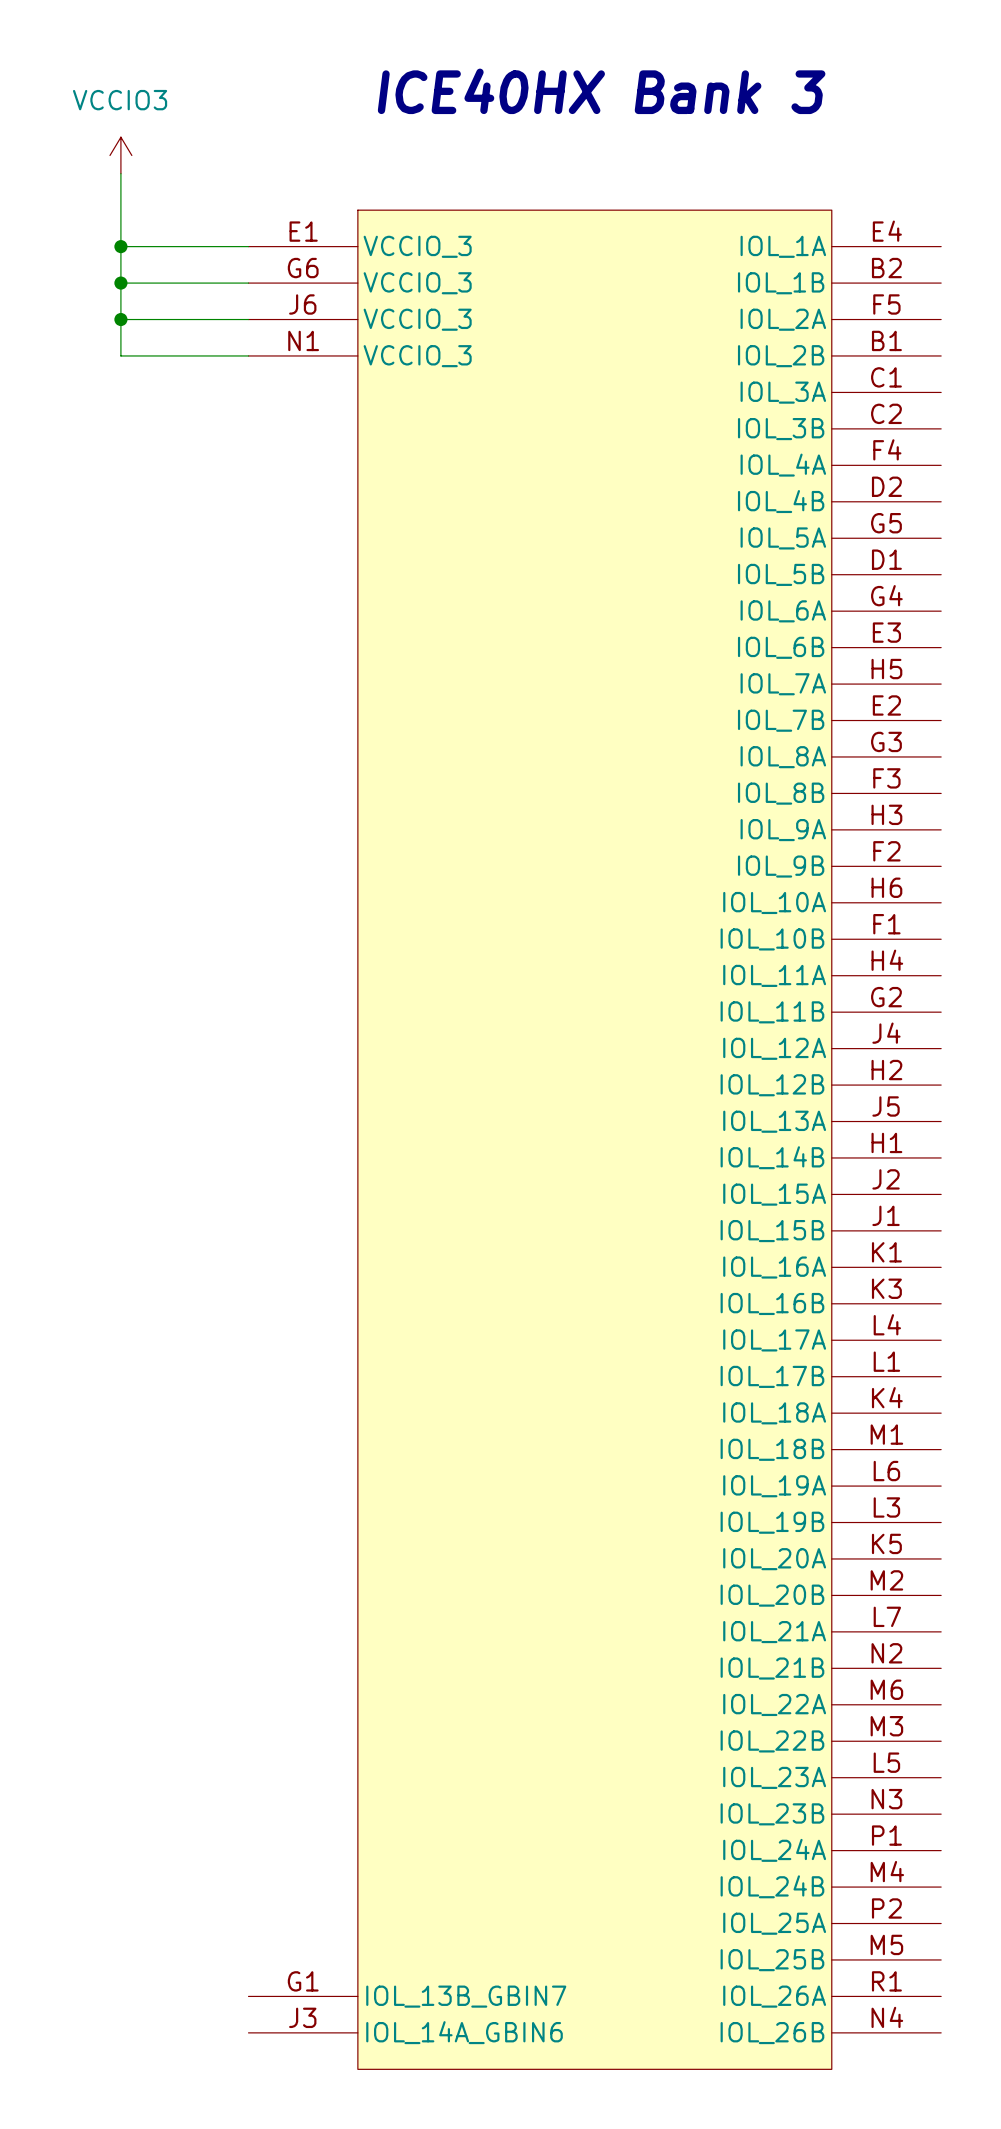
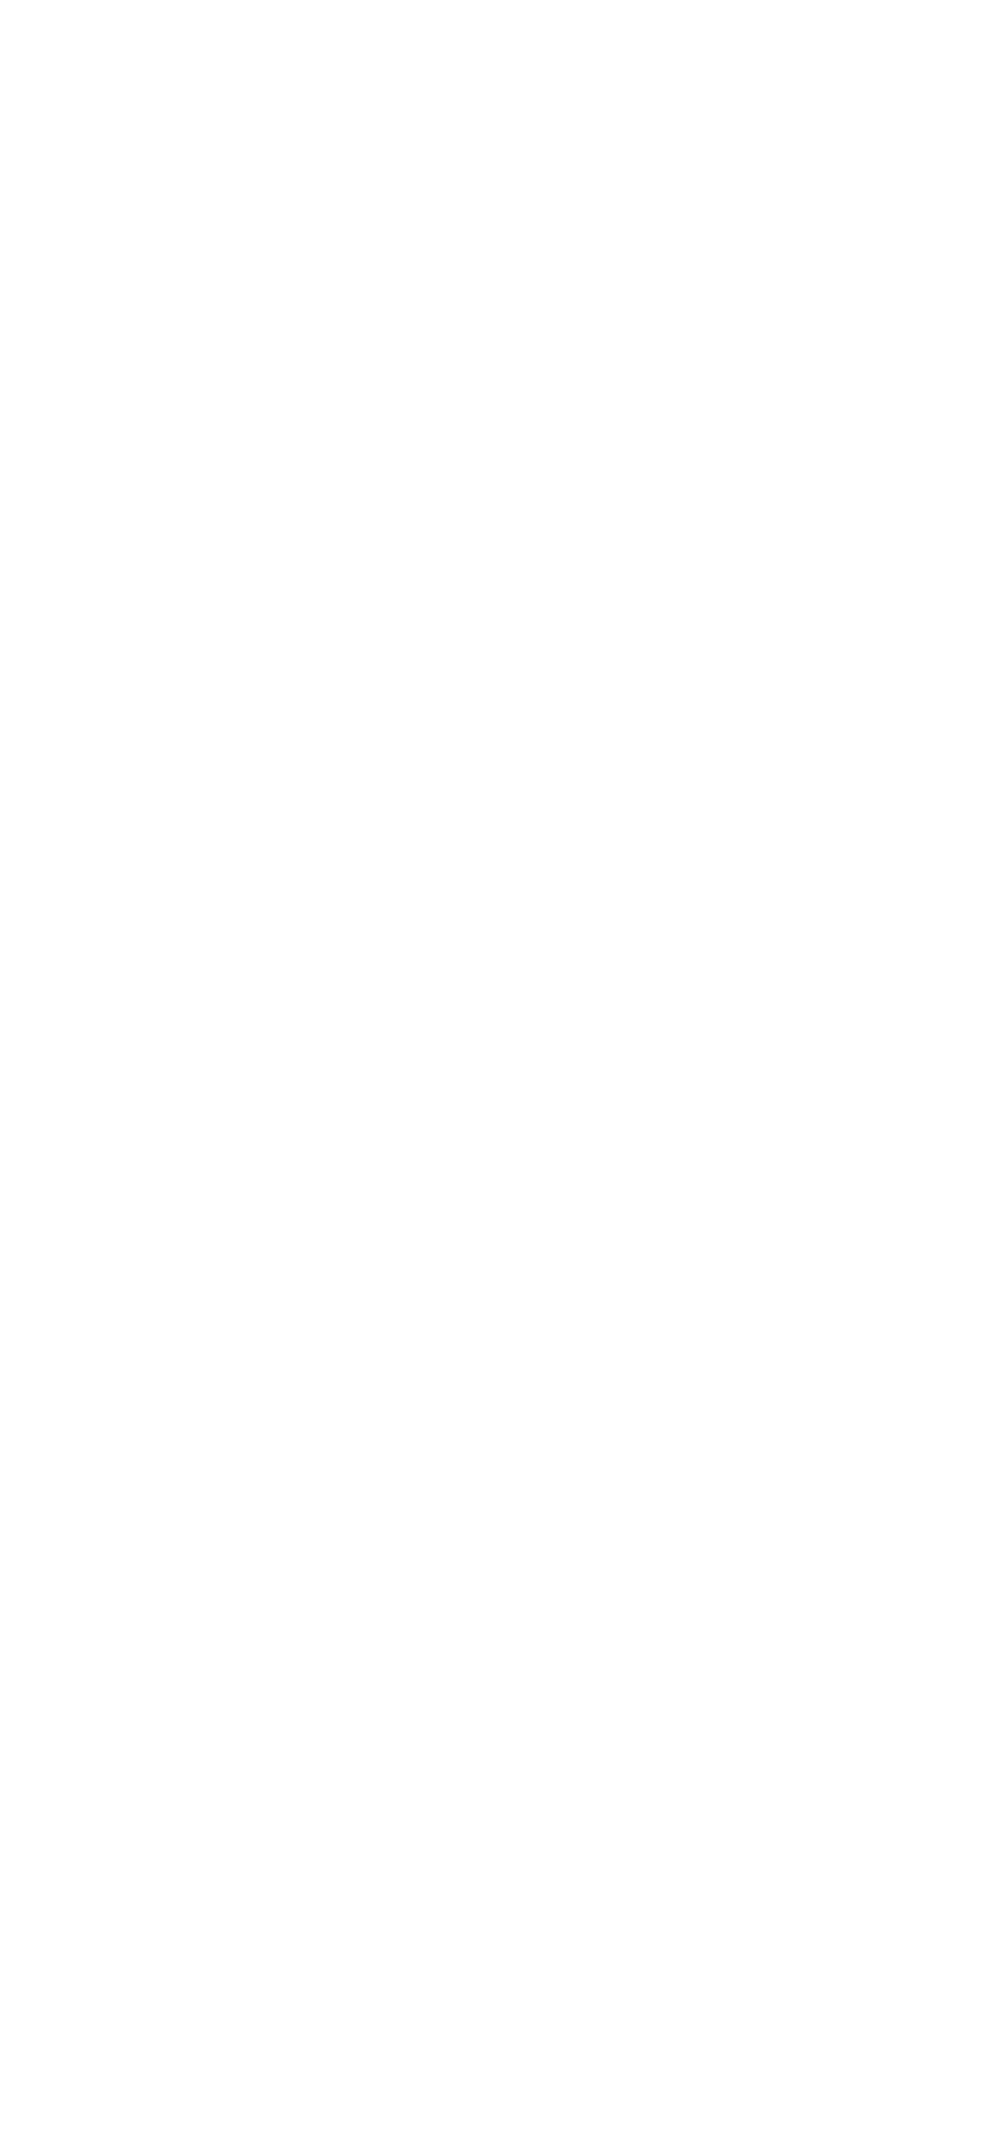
text: ICE40HX Bank 3 (601, 91) -> none
power symbol: VCCIO3 (120, 155) -> none
wire: (120, 173) (120, 355) (248, 355) -> none
wire: (120, 246) (248, 246) -> none
junction: (120, 246) -> none
wire: (120, 283) (248, 283) -> none
junction: (120, 283) -> none
wire: (120, 319) (248, 319) -> none
junction: (120, 319) -> none
part: (594, 1139) -> none

